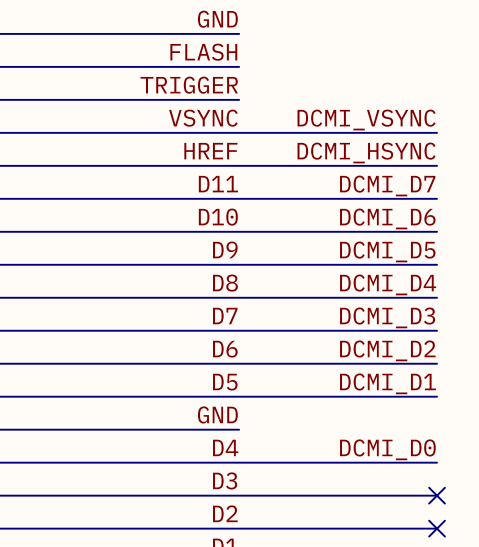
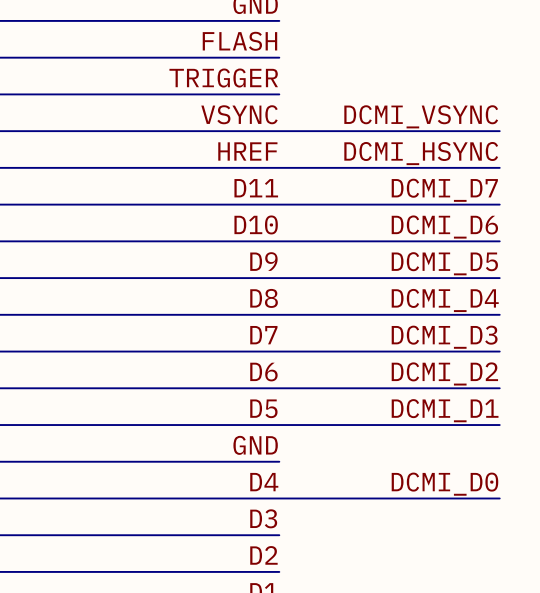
wire: (239, 495) (437, 495) -> none
no-connect mark: (437, 495) -> none
wire: (239, 528) (437, 528) -> none
no-connect mark: (437, 528) -> none

